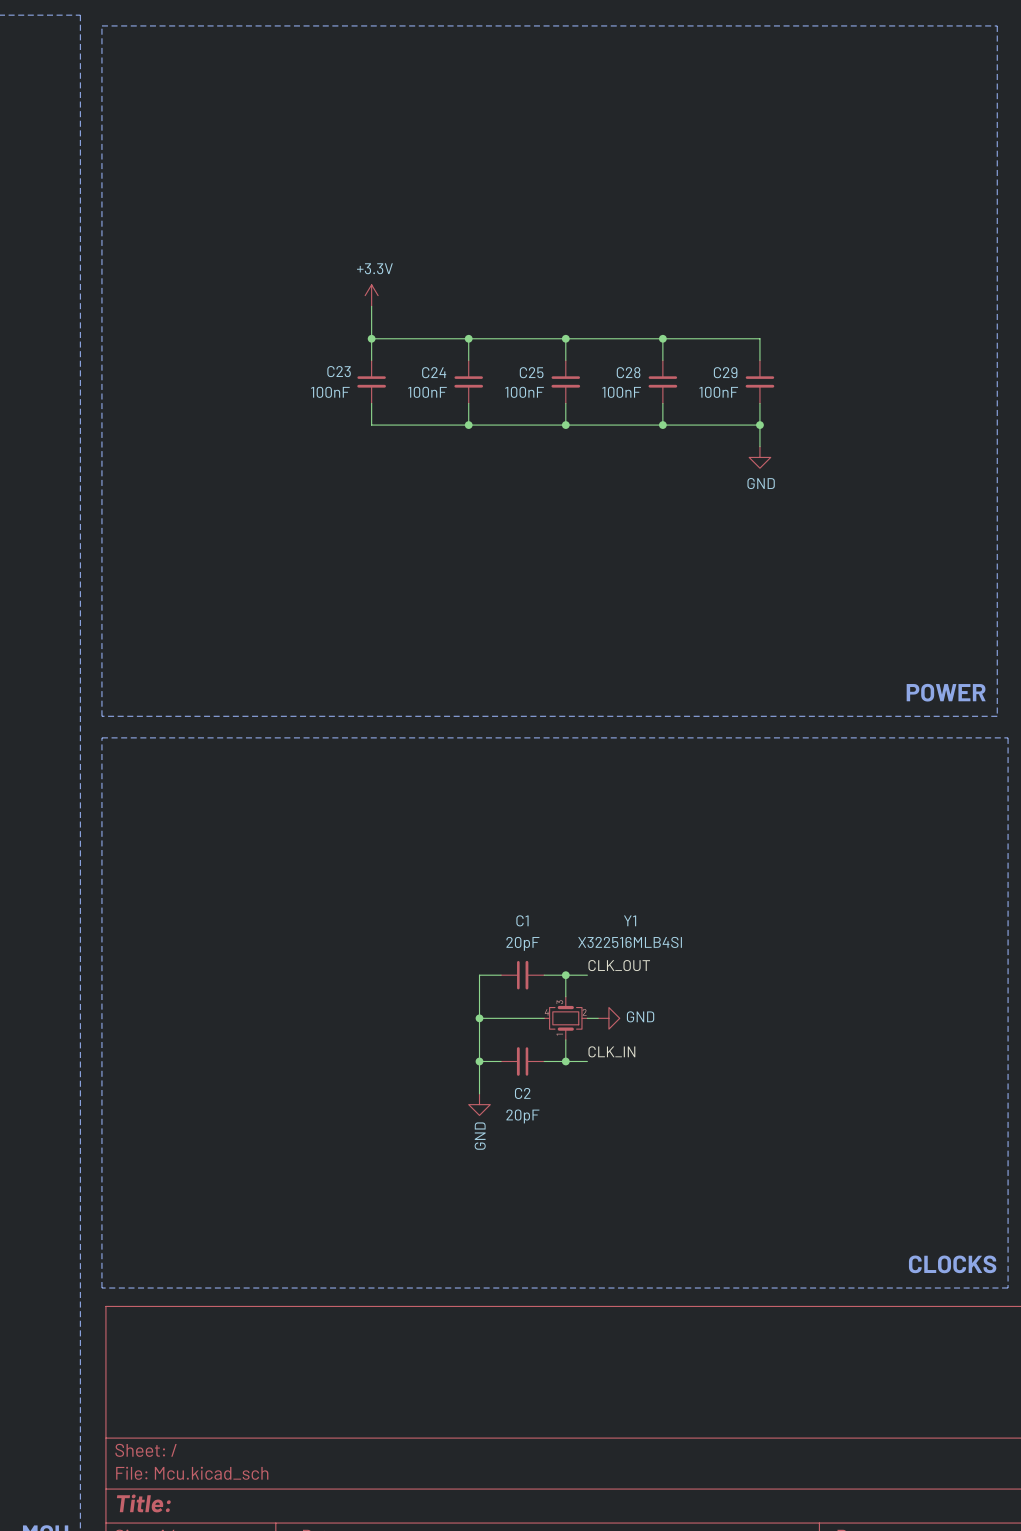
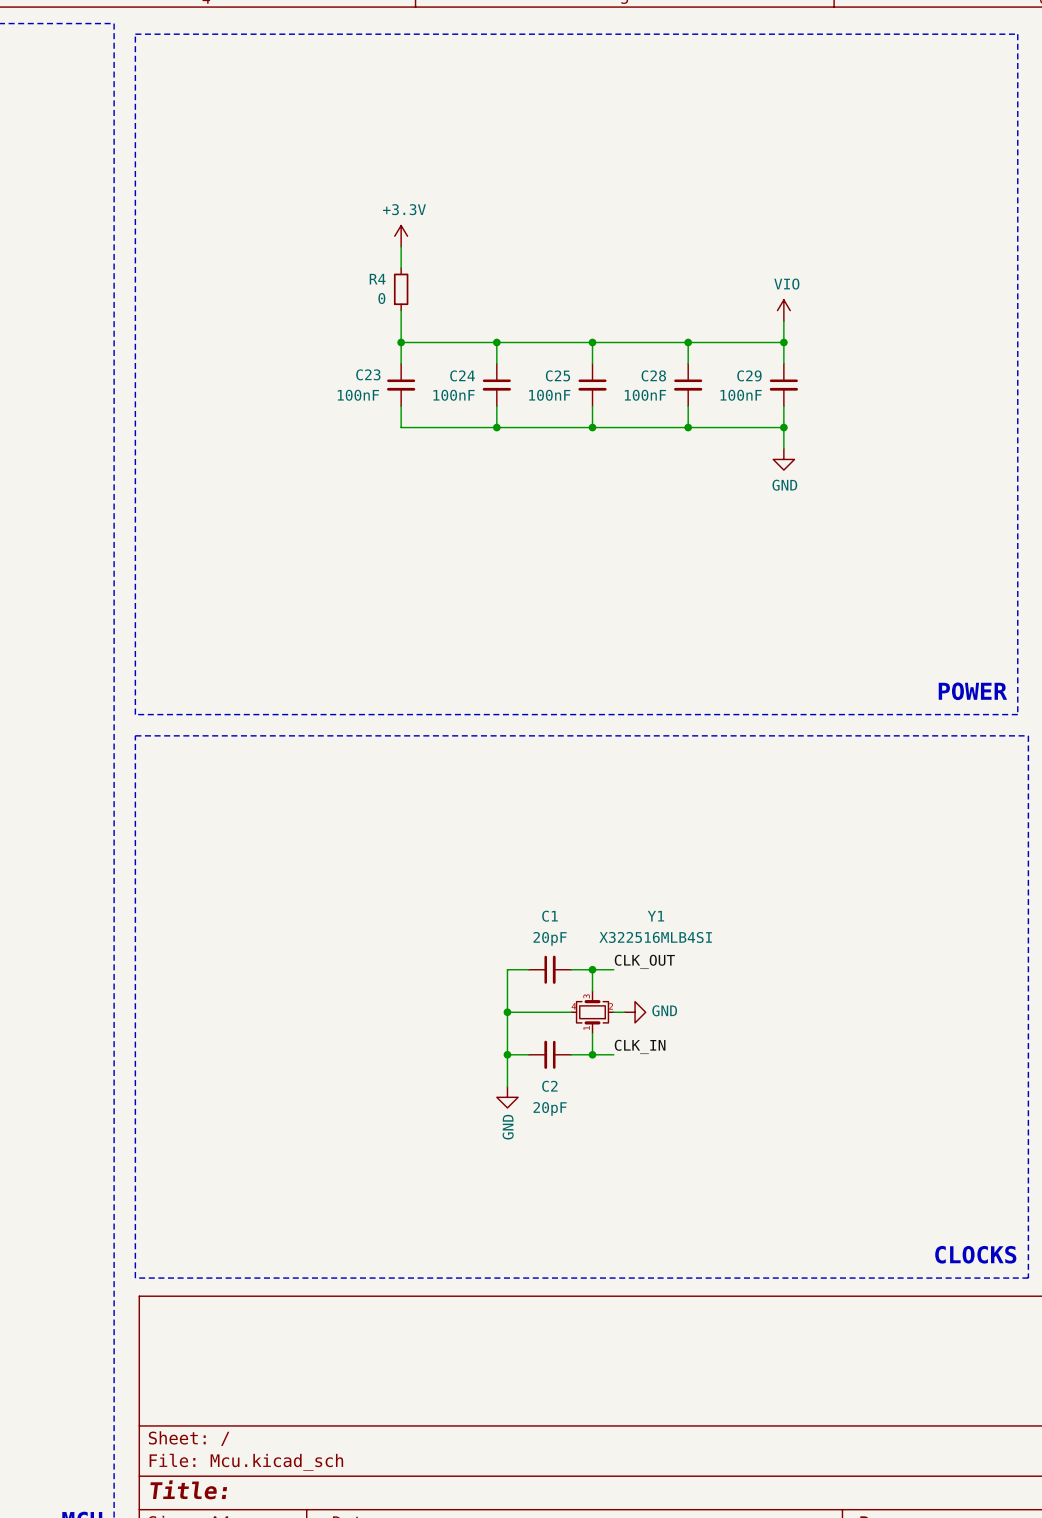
wire: none -> (401, 246) (401, 268)
R4: none -> 0 (401, 289)
power symbol position: +3.3V (371, 295) -> +3.3V (401, 236)
power symbol: none -> VIO (783, 310)
wire: none -> (783, 321) (783, 342)
junction: none -> (783, 342)

